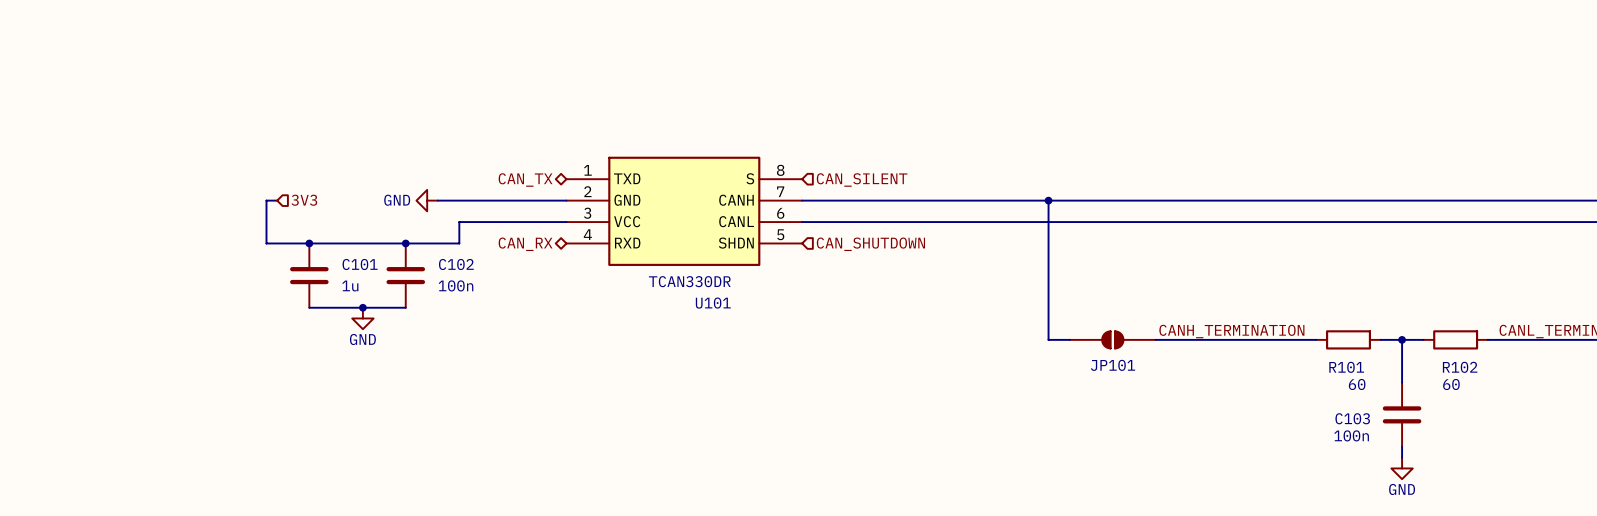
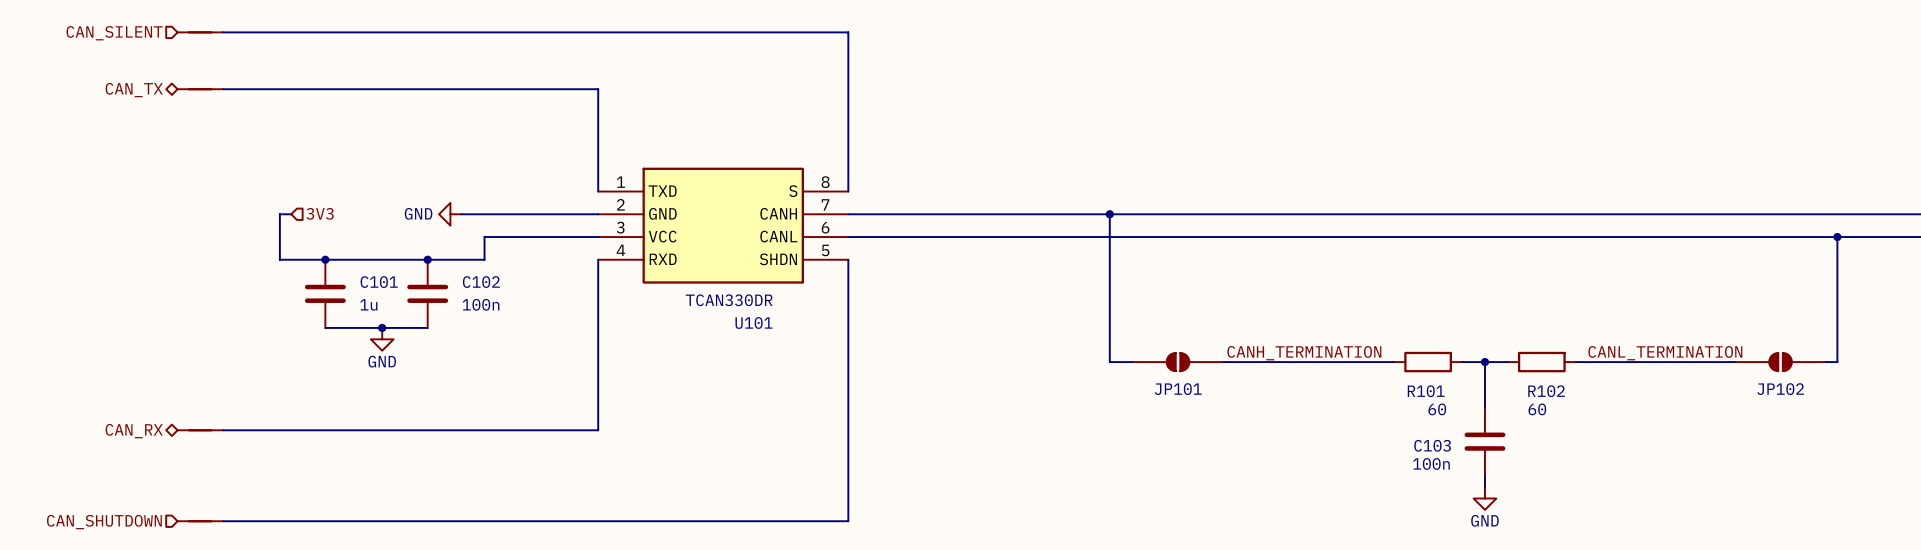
part: none -> (200, 32)
wire: none -> (223, 32) (848, 32) (848, 191)
hierarchical label: none -> CAN_SILENT (114, 33)
part: none -> (200, 89)
wire: none -> (223, 89) (598, 89) (598, 191)
hierarchical label: none -> CAN_TX (134, 90)
hierarchical label: CAN_TX (525, 180) -> none
hierarchical label: CAN_SILENT (862, 180) -> none
wire: none -> (598, 259) (598, 430) (223, 430)
wire: none -> (848, 259) (848, 521) (223, 521)
hierarchical label: CAN_RX (525, 244) -> none
hierarchical label: CAN_SHUTDOWN (870, 244) -> none
hierarchical label: none -> CAN_RX (134, 431)
part: none -> (200, 430)
part: none -> (200, 521)
hierarchical label: none -> CAN_SHUTDOWN (104, 522)

